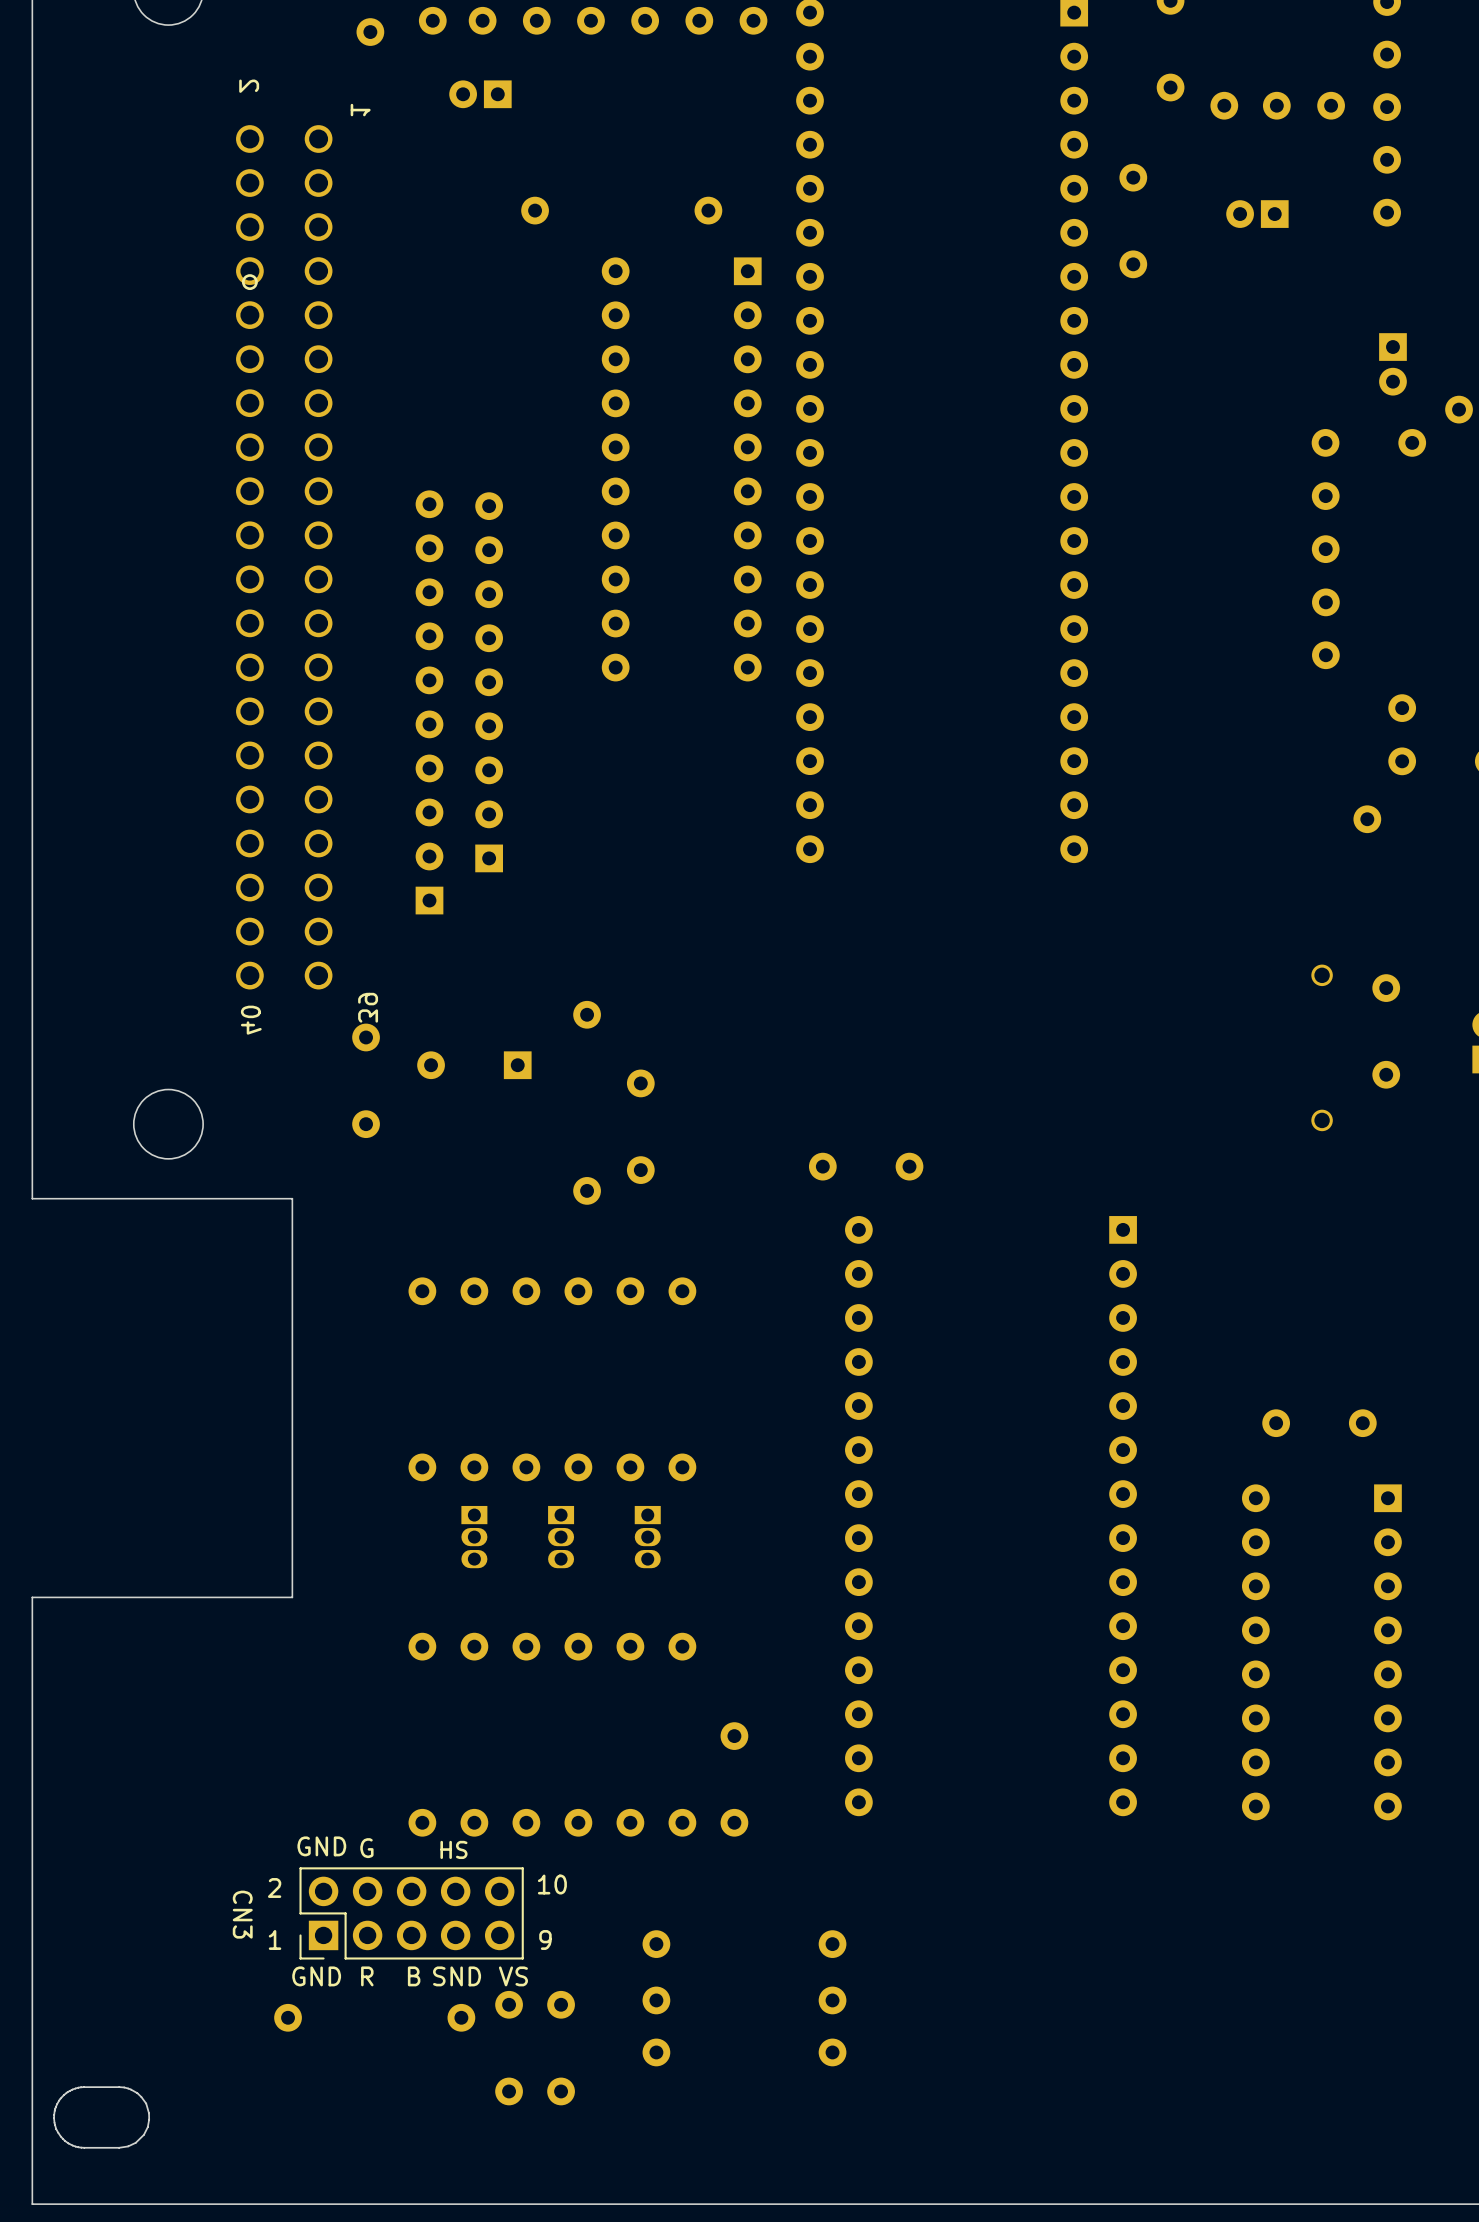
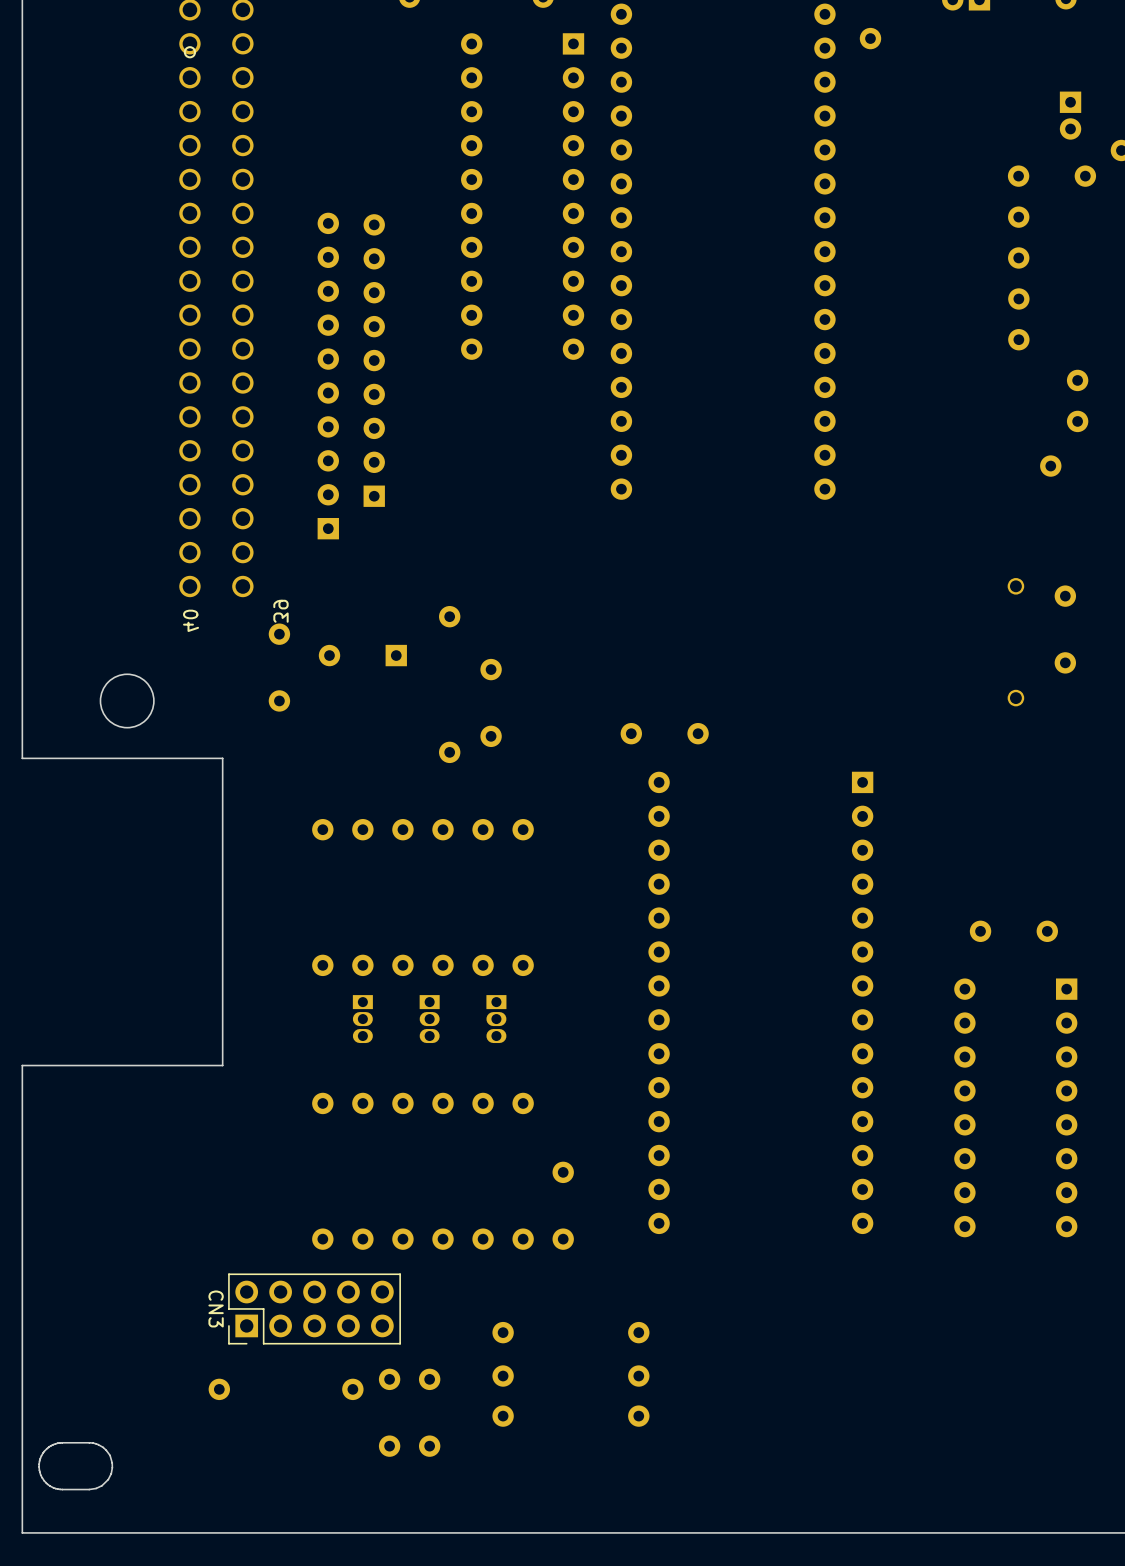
text: GND (321, 1846) -> none
text: G (366, 1848) -> none
text: HS (453, 1849) -> none
text: 10 (552, 1884) -> none
text: 2 (274, 1887) -> none
CN3 name position: CN3 (242, 1914) -> CN3 (216, 1308)
text: 1 (275, 1939) -> none
text: 9 (545, 1939) -> none
text: GND (316, 1976) -> none
text: R (367, 1976) -> none
text: B (414, 1976) -> none
text: SND (457, 1976) -> none
text: VS (513, 1976) -> none

